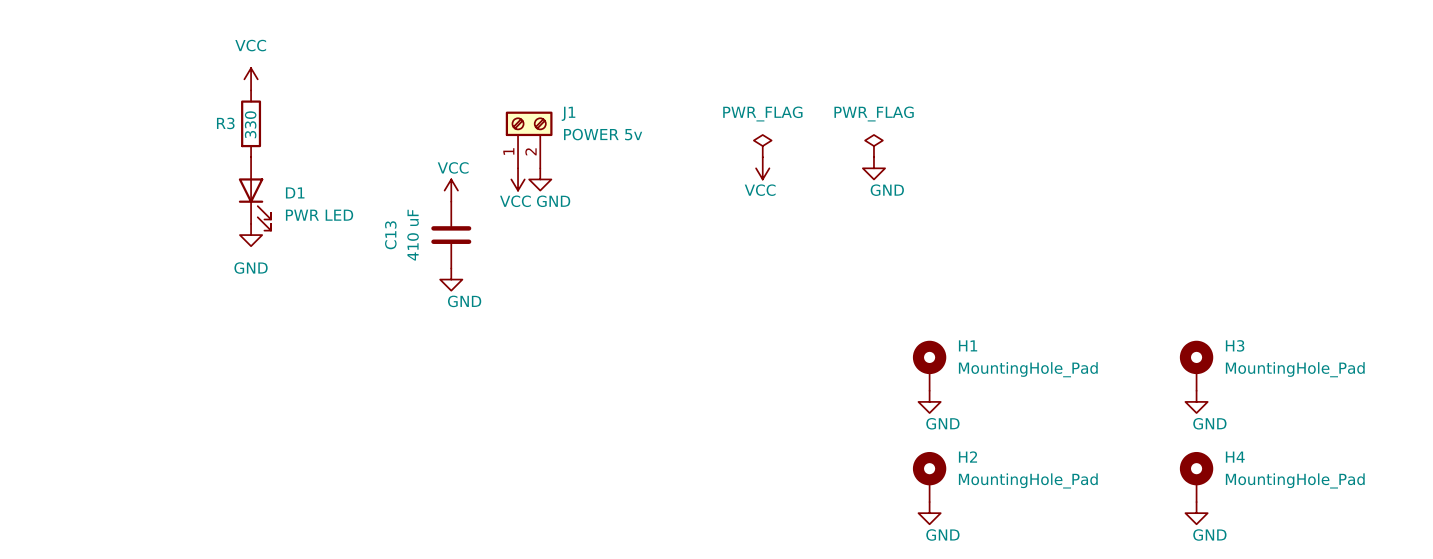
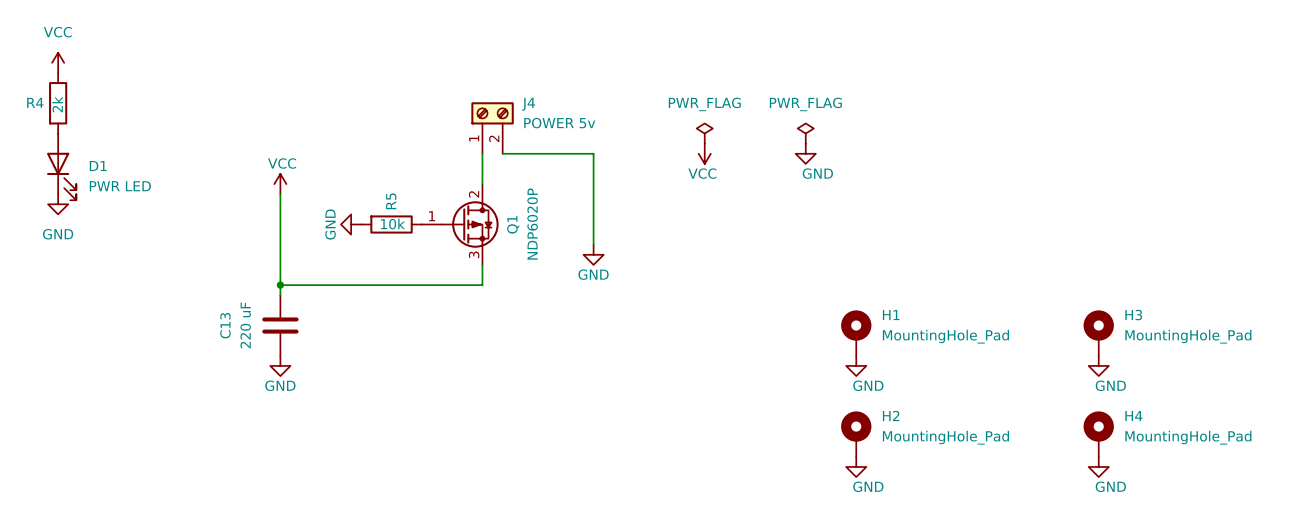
power symbol: none -> VCC (58, 62)
power symbol: VCC (251, 79) -> none
R4: none -> 2k (58, 103)
J1 name: J1 (568, 113) -> J4 (528, 104)
R3: 330 (251, 123) -> none
wire: none -> (502, 153) (593, 153) (593, 244)
power symbol: VCC (518, 179) -> none
power symbol: GND (540, 179) -> none
power symbol: VCC (451, 190) -> none
D1 position: (254, 193) -> (61, 166)
power symbol: none -> VCC (280, 184)
wire: none -> (280, 194) (280, 295)
power symbol: none -> GND (58, 204)
power symbol: GND (251, 235) -> none
C13 value: 410 uF (413, 235) -> 220 uF (245, 325)
C13 position: (451, 235) -> (280, 325)
power symbol: none -> GND (351, 224)
R5: none -> 10k (391, 224)
Q1: none -> NDP6020P (460, 224)
power symbol: GND (451, 279) -> none
power symbol: none -> GND (593, 254)
wire: none -> (482, 264) (482, 285) (280, 285)
junction: none -> (280, 285)
power symbol: none -> GND (280, 365)

